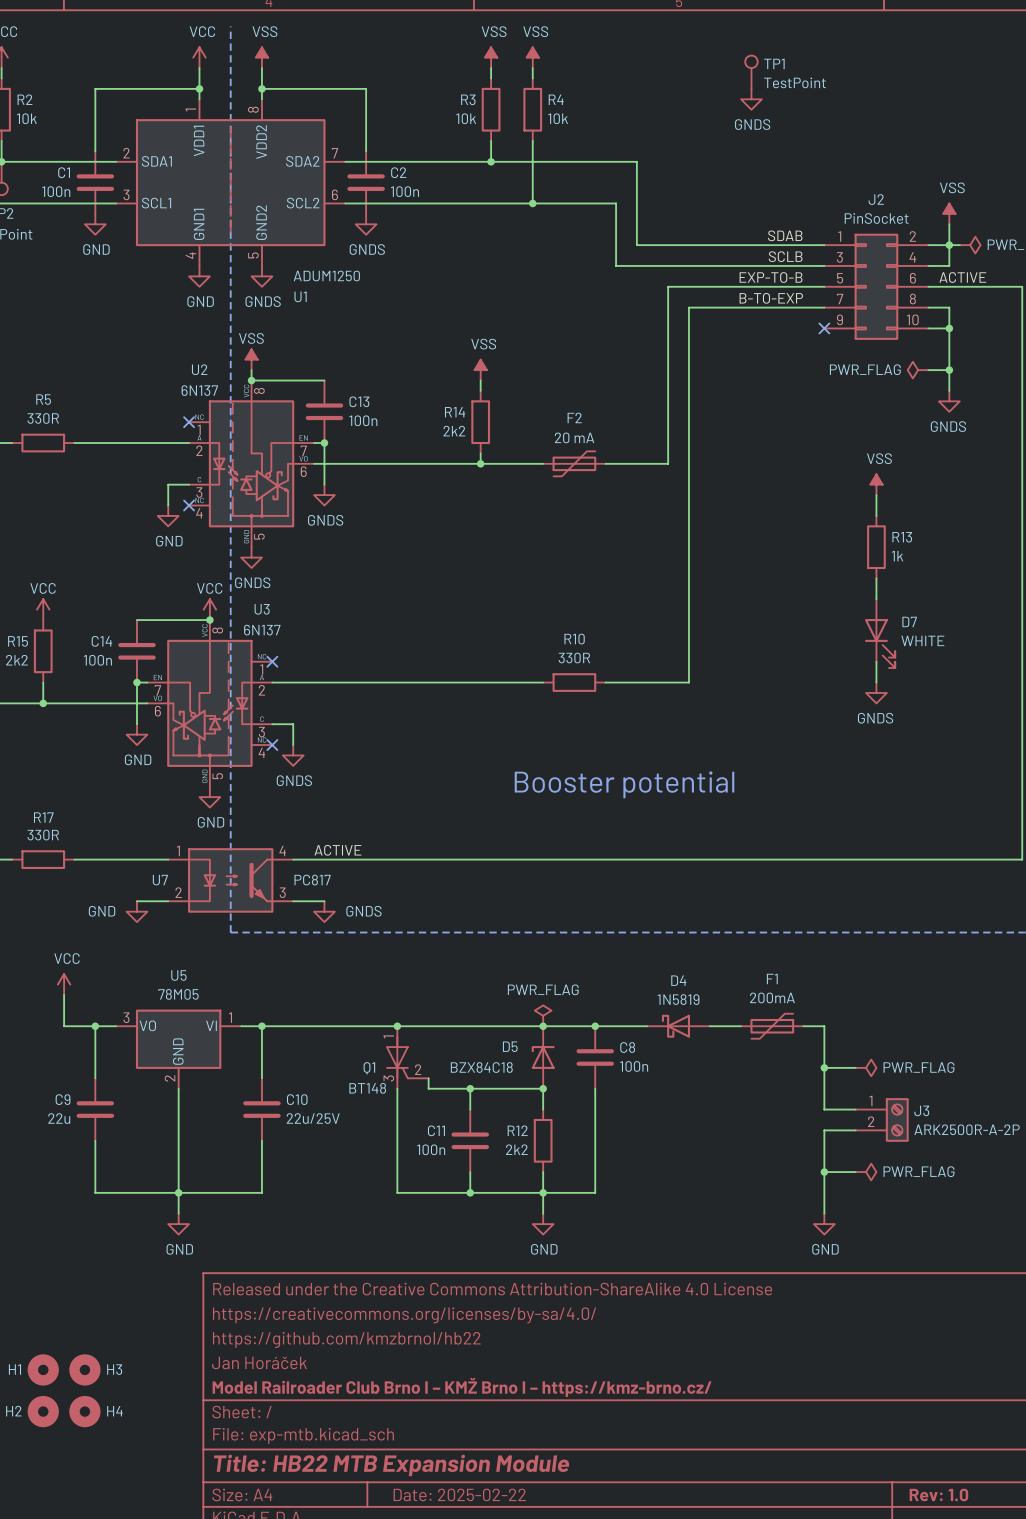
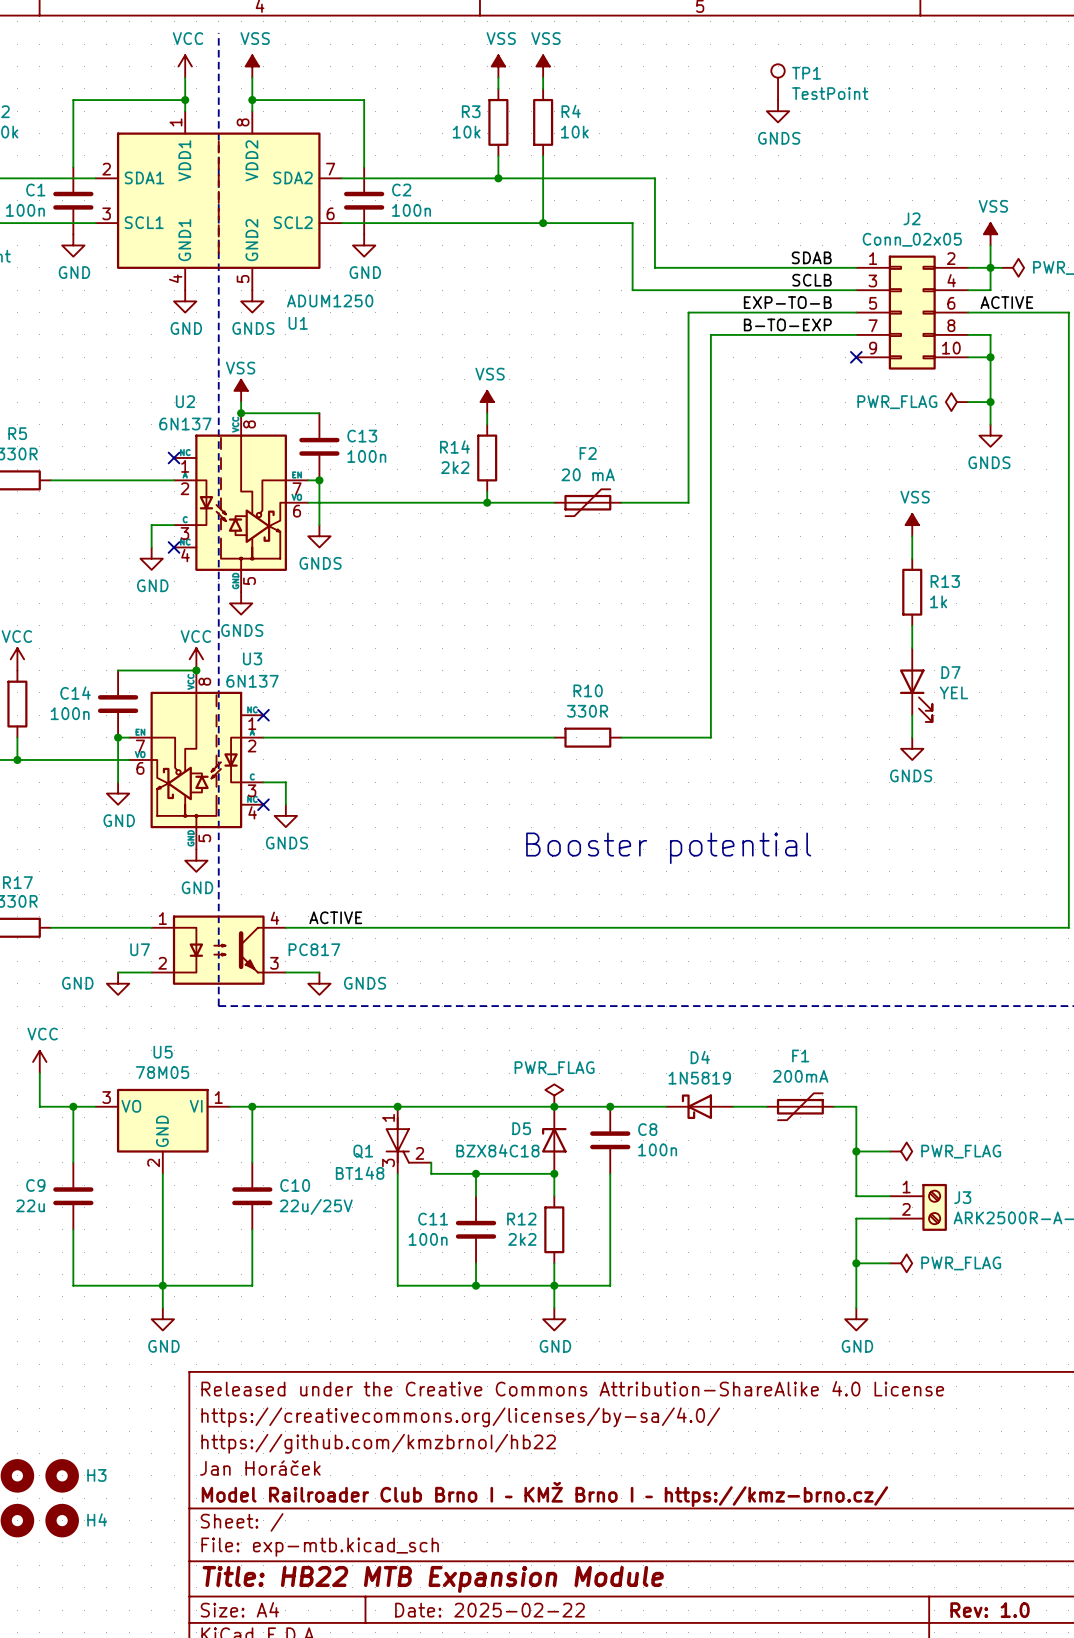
J2 value: PinSocket (876, 218) -> Conn_02x05 (912, 239)
power symbol: GNDS (366, 224) -> GND (364, 245)
D7 value: WHITE (922, 640) -> YEL (953, 692)

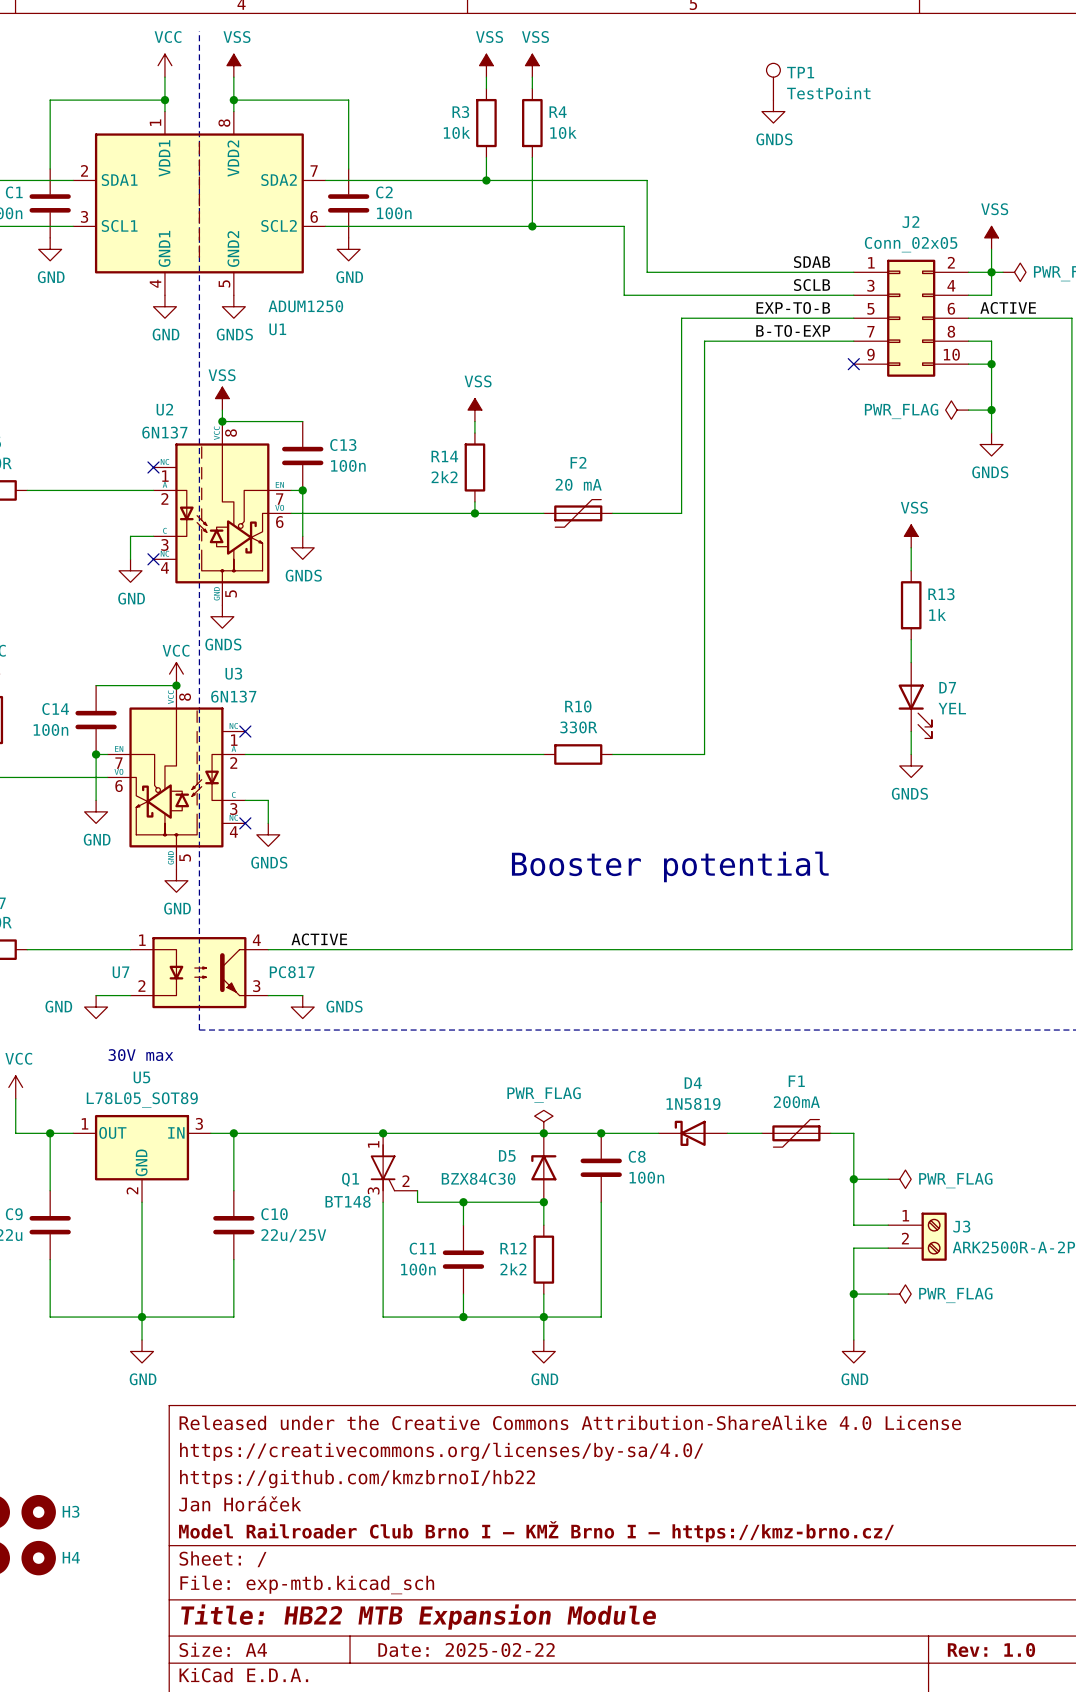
text: none -> 30V max (140, 1055)
U5 value: 78M05 (162, 1072) -> L78L05_SOT89 (142, 1099)
U5 pin number: 3 (106, 1097) -> 1 (85, 1123)
U5 pin number: 1 (218, 1097) -> 3 (199, 1123)
U5 pin name: VO (131, 1106) -> OUT (112, 1132)
U5 pin name: VI (196, 1106) -> IN (176, 1132)
D5 value: BZX84C18 (497, 1150) -> BZX84C30 (478, 1178)

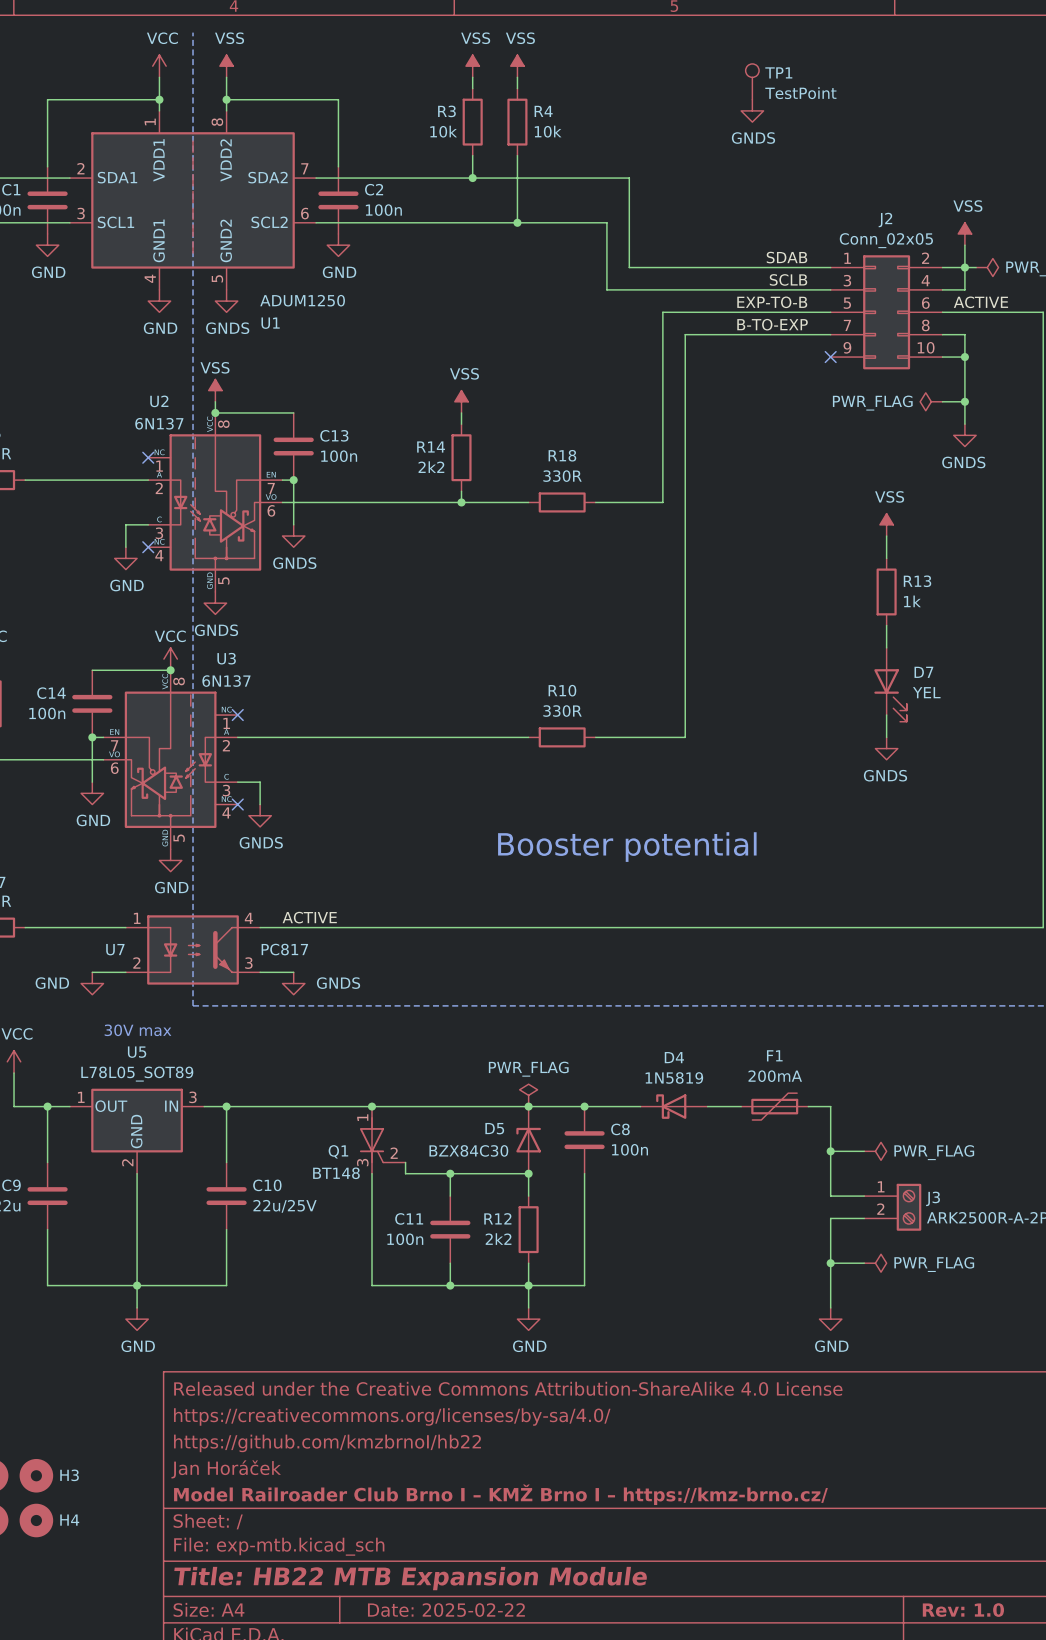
F2: 20 mA (578, 513) -> none
R18: none -> 330R (562, 502)

